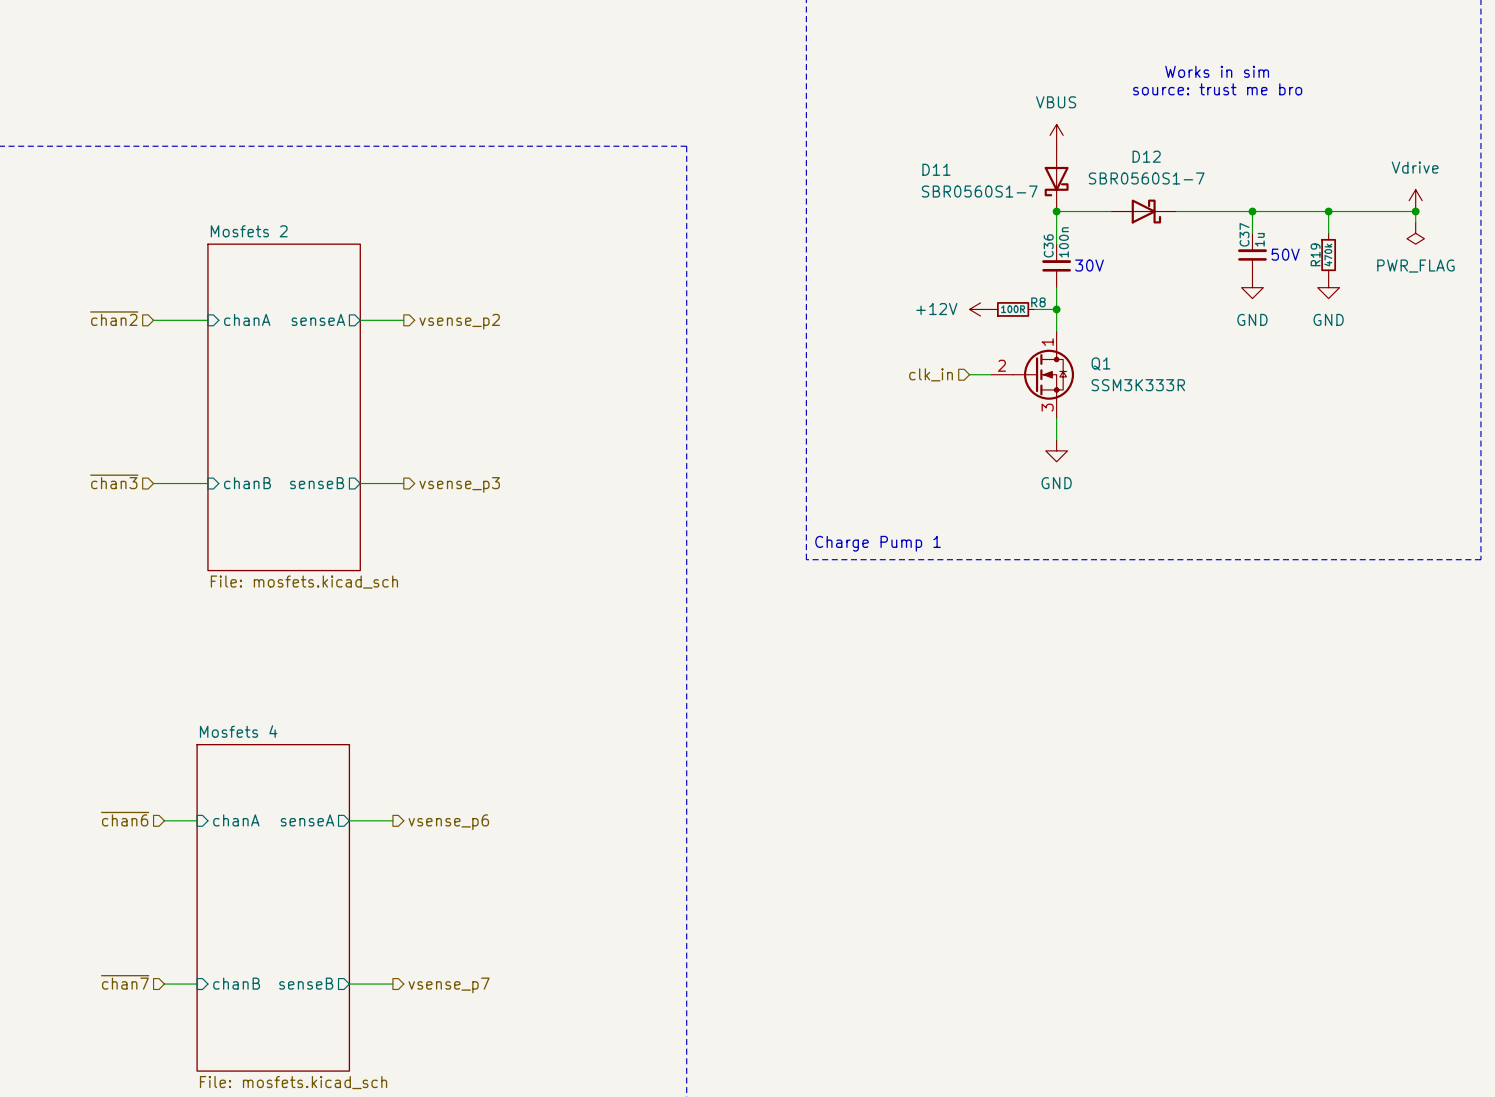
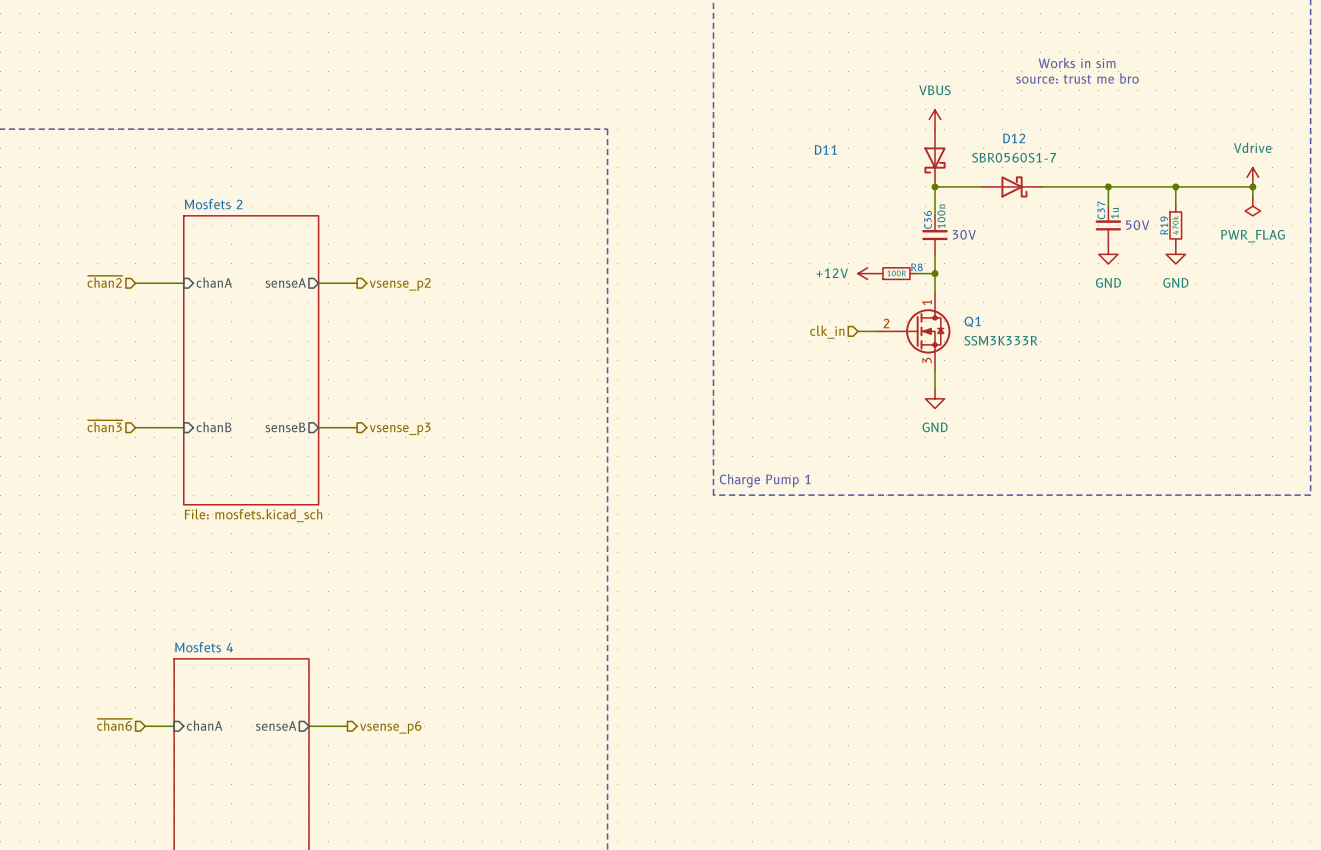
D11 value: SBR0560S1-7 (979, 191) -> none

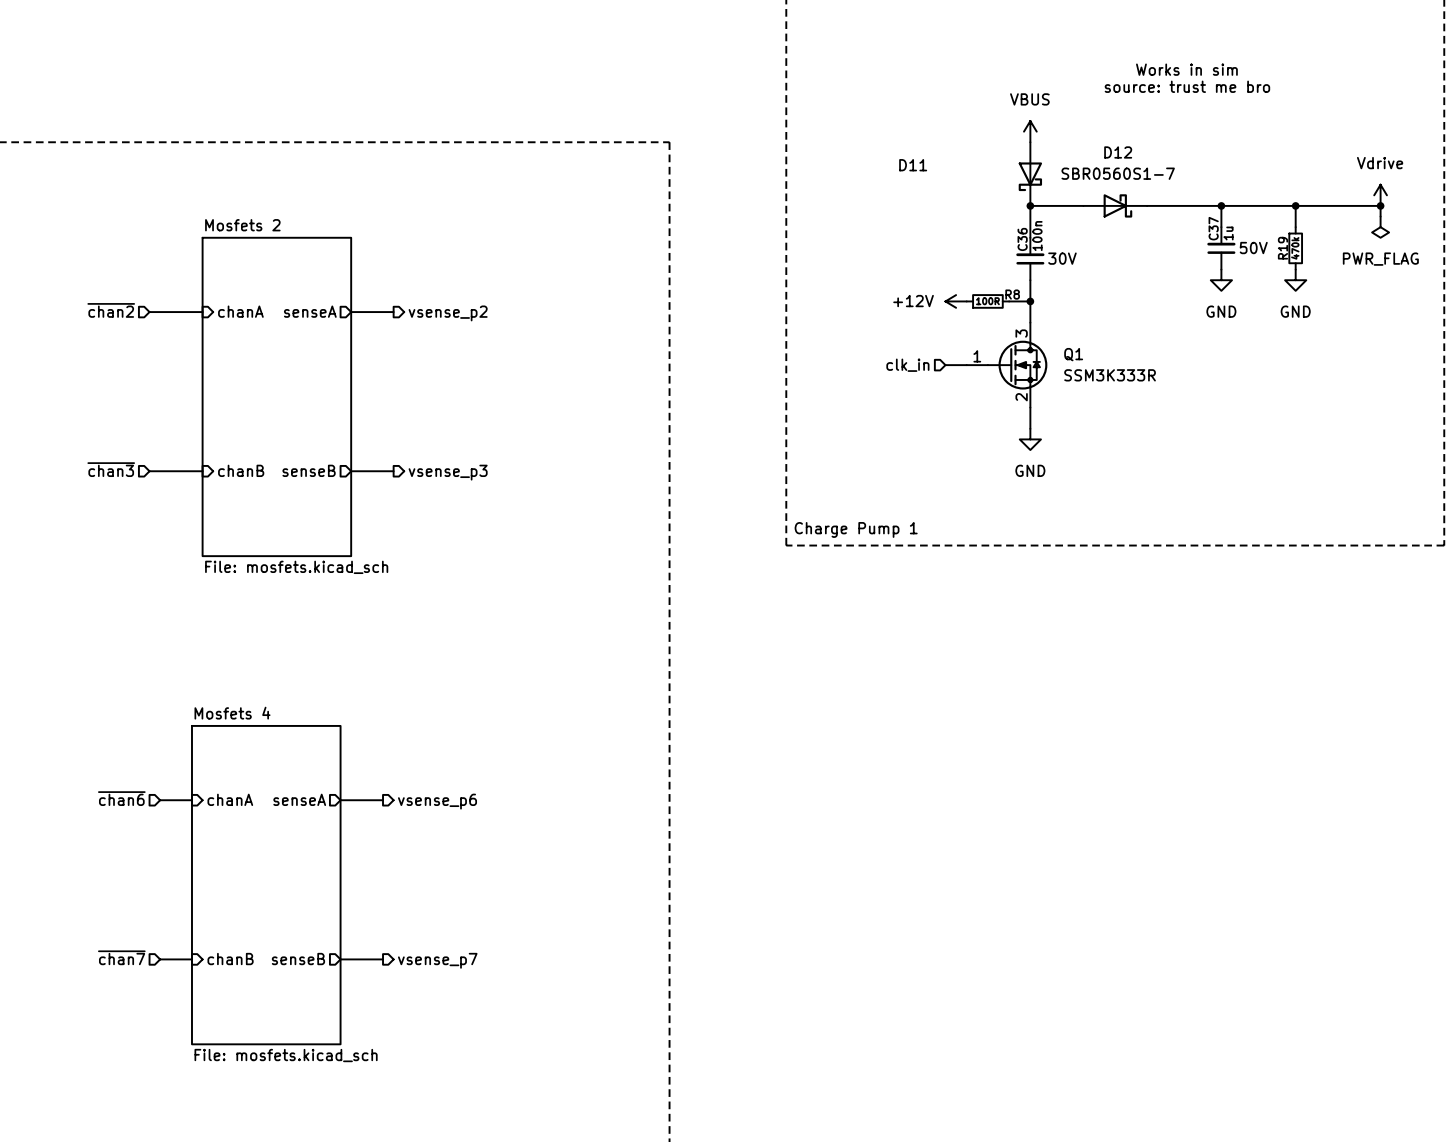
Q1 pin number: 1 (927, 302) -> 3 (1021, 333)
Q1 pin number: 2 (886, 323) -> 1 (977, 356)
Q1 pin number: 3 (927, 360) -> 2 (1021, 397)

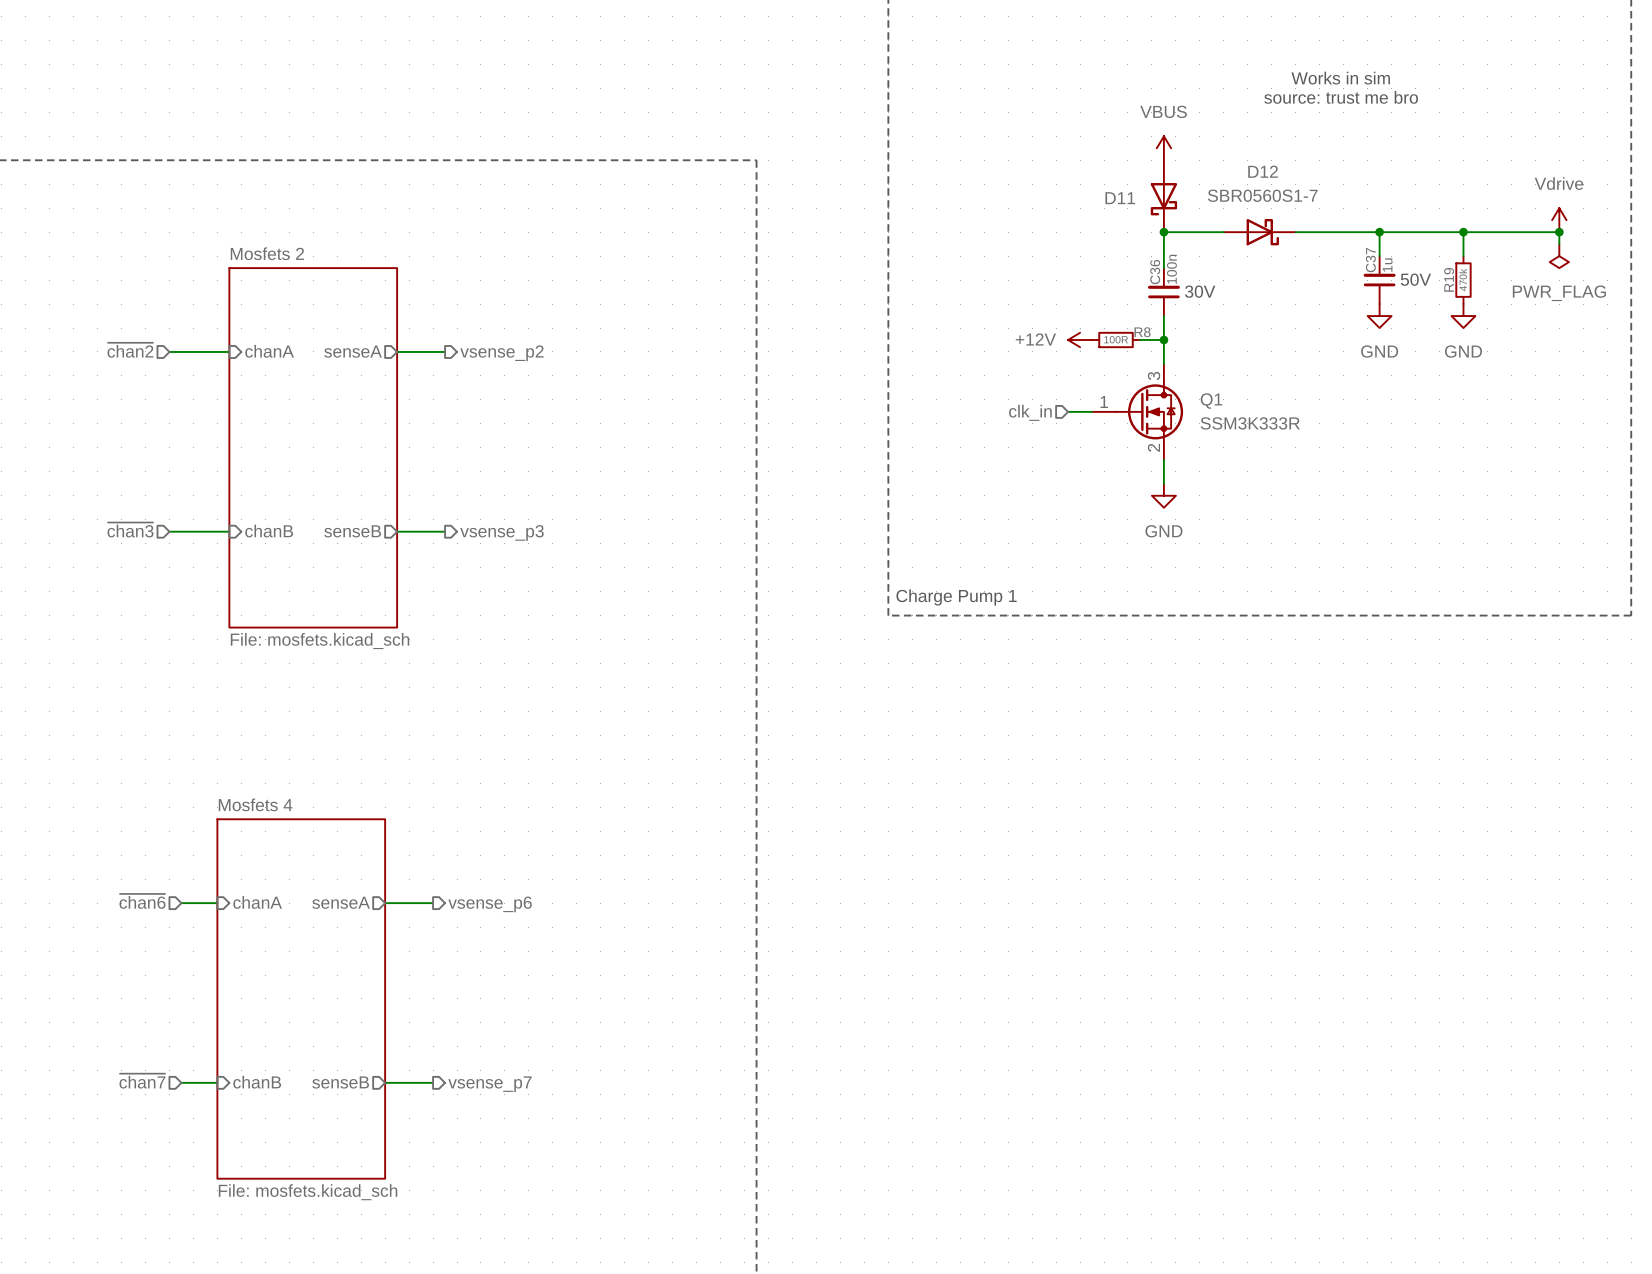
D11 name position: D11 (913, 165) -> D11 (1120, 198)

